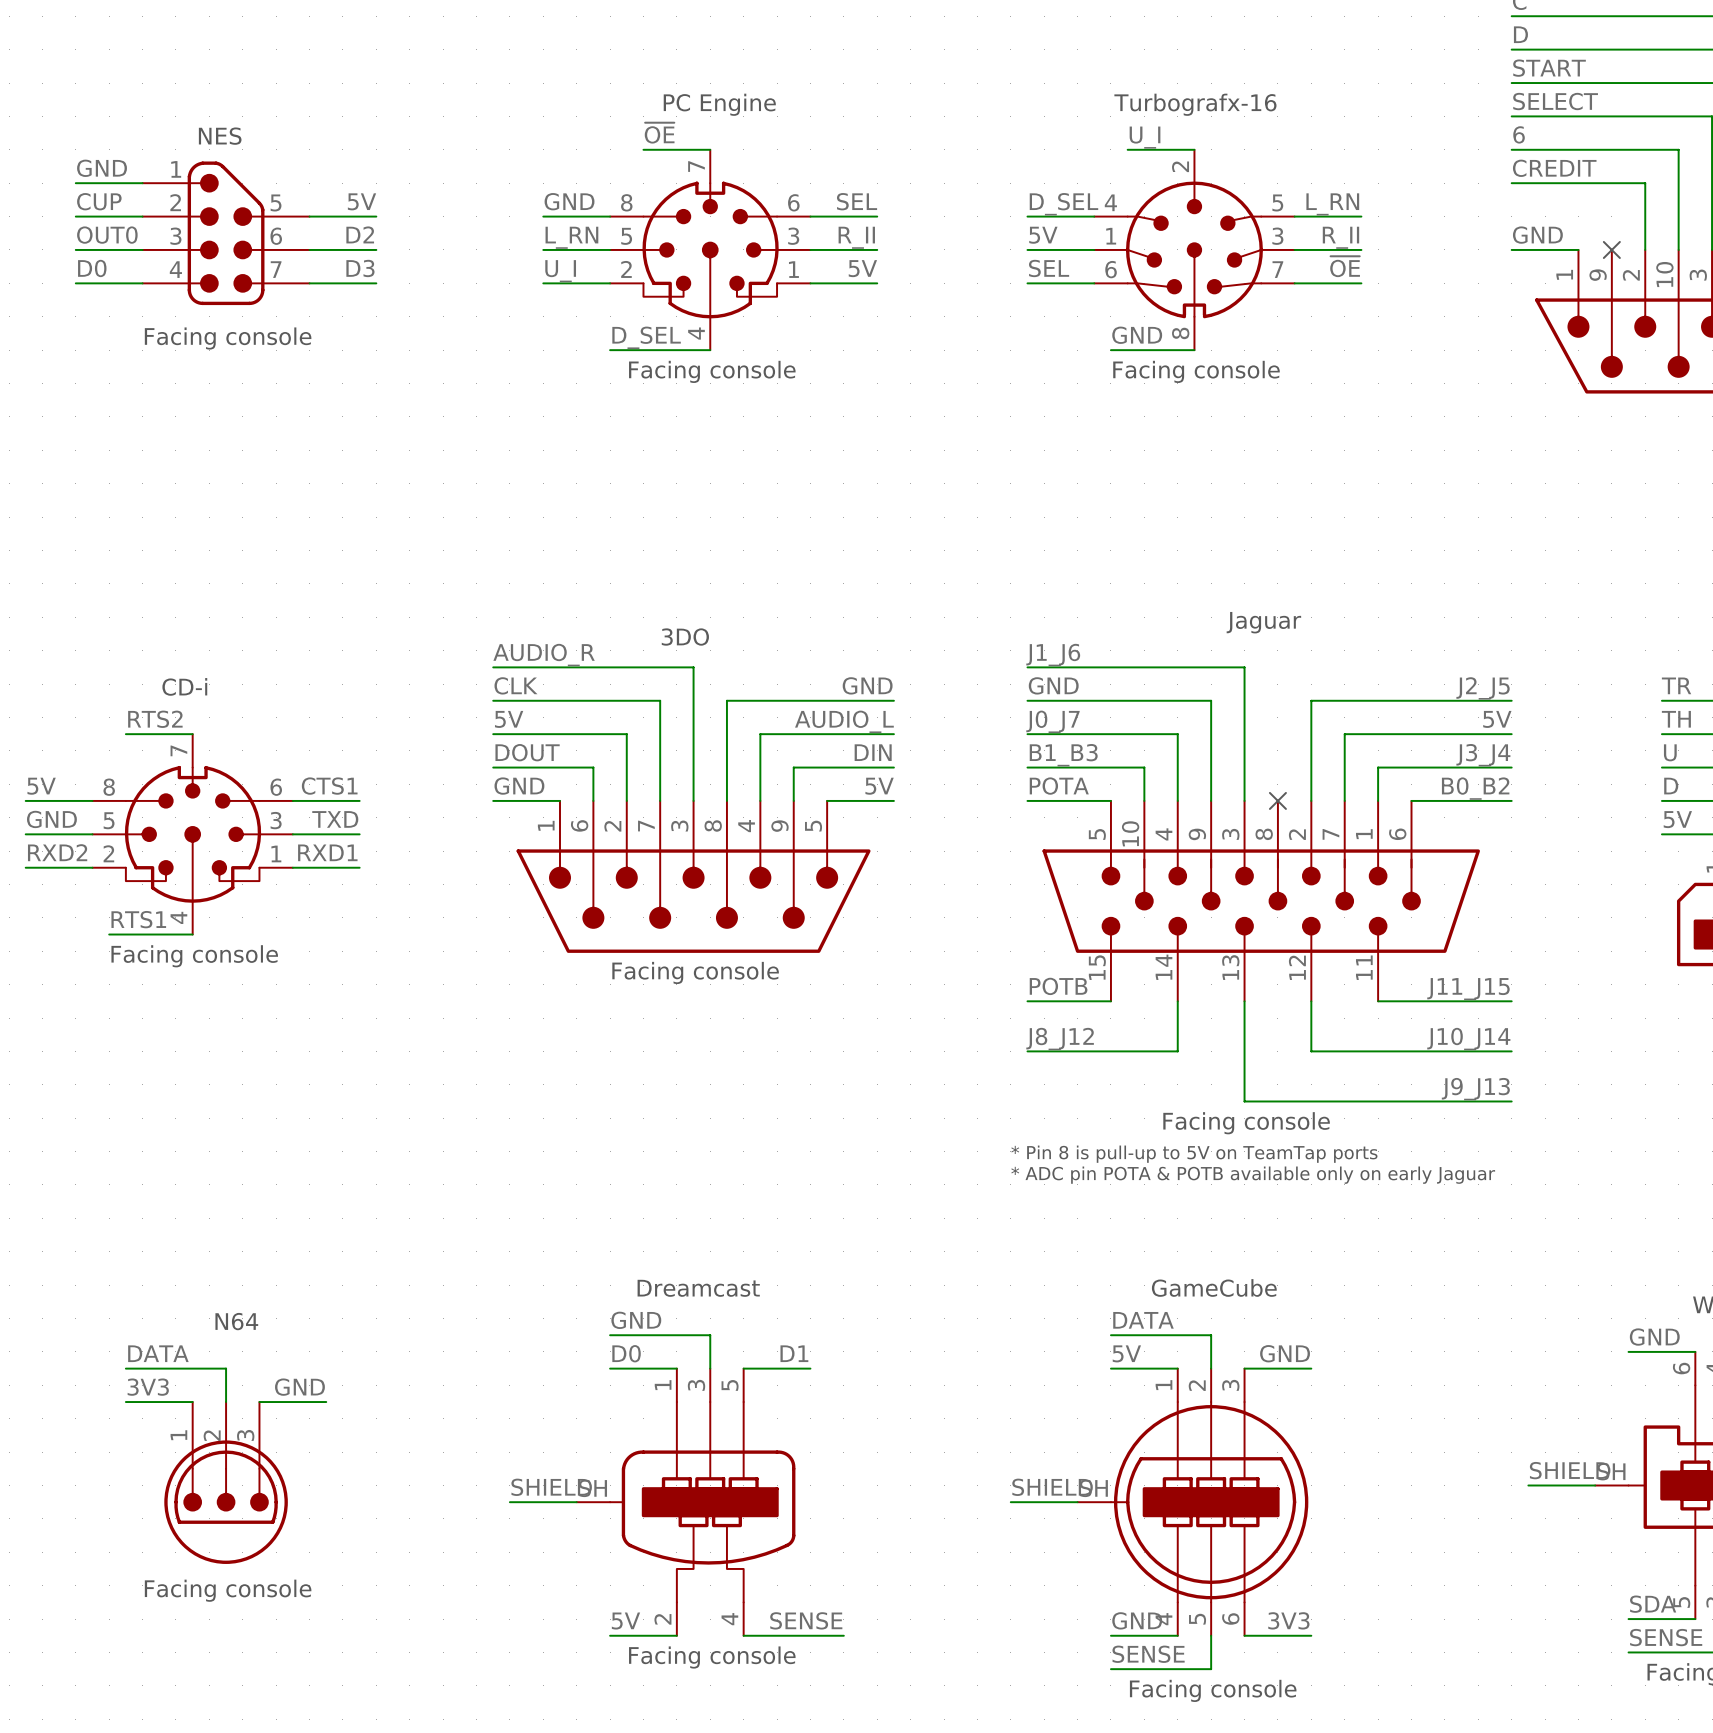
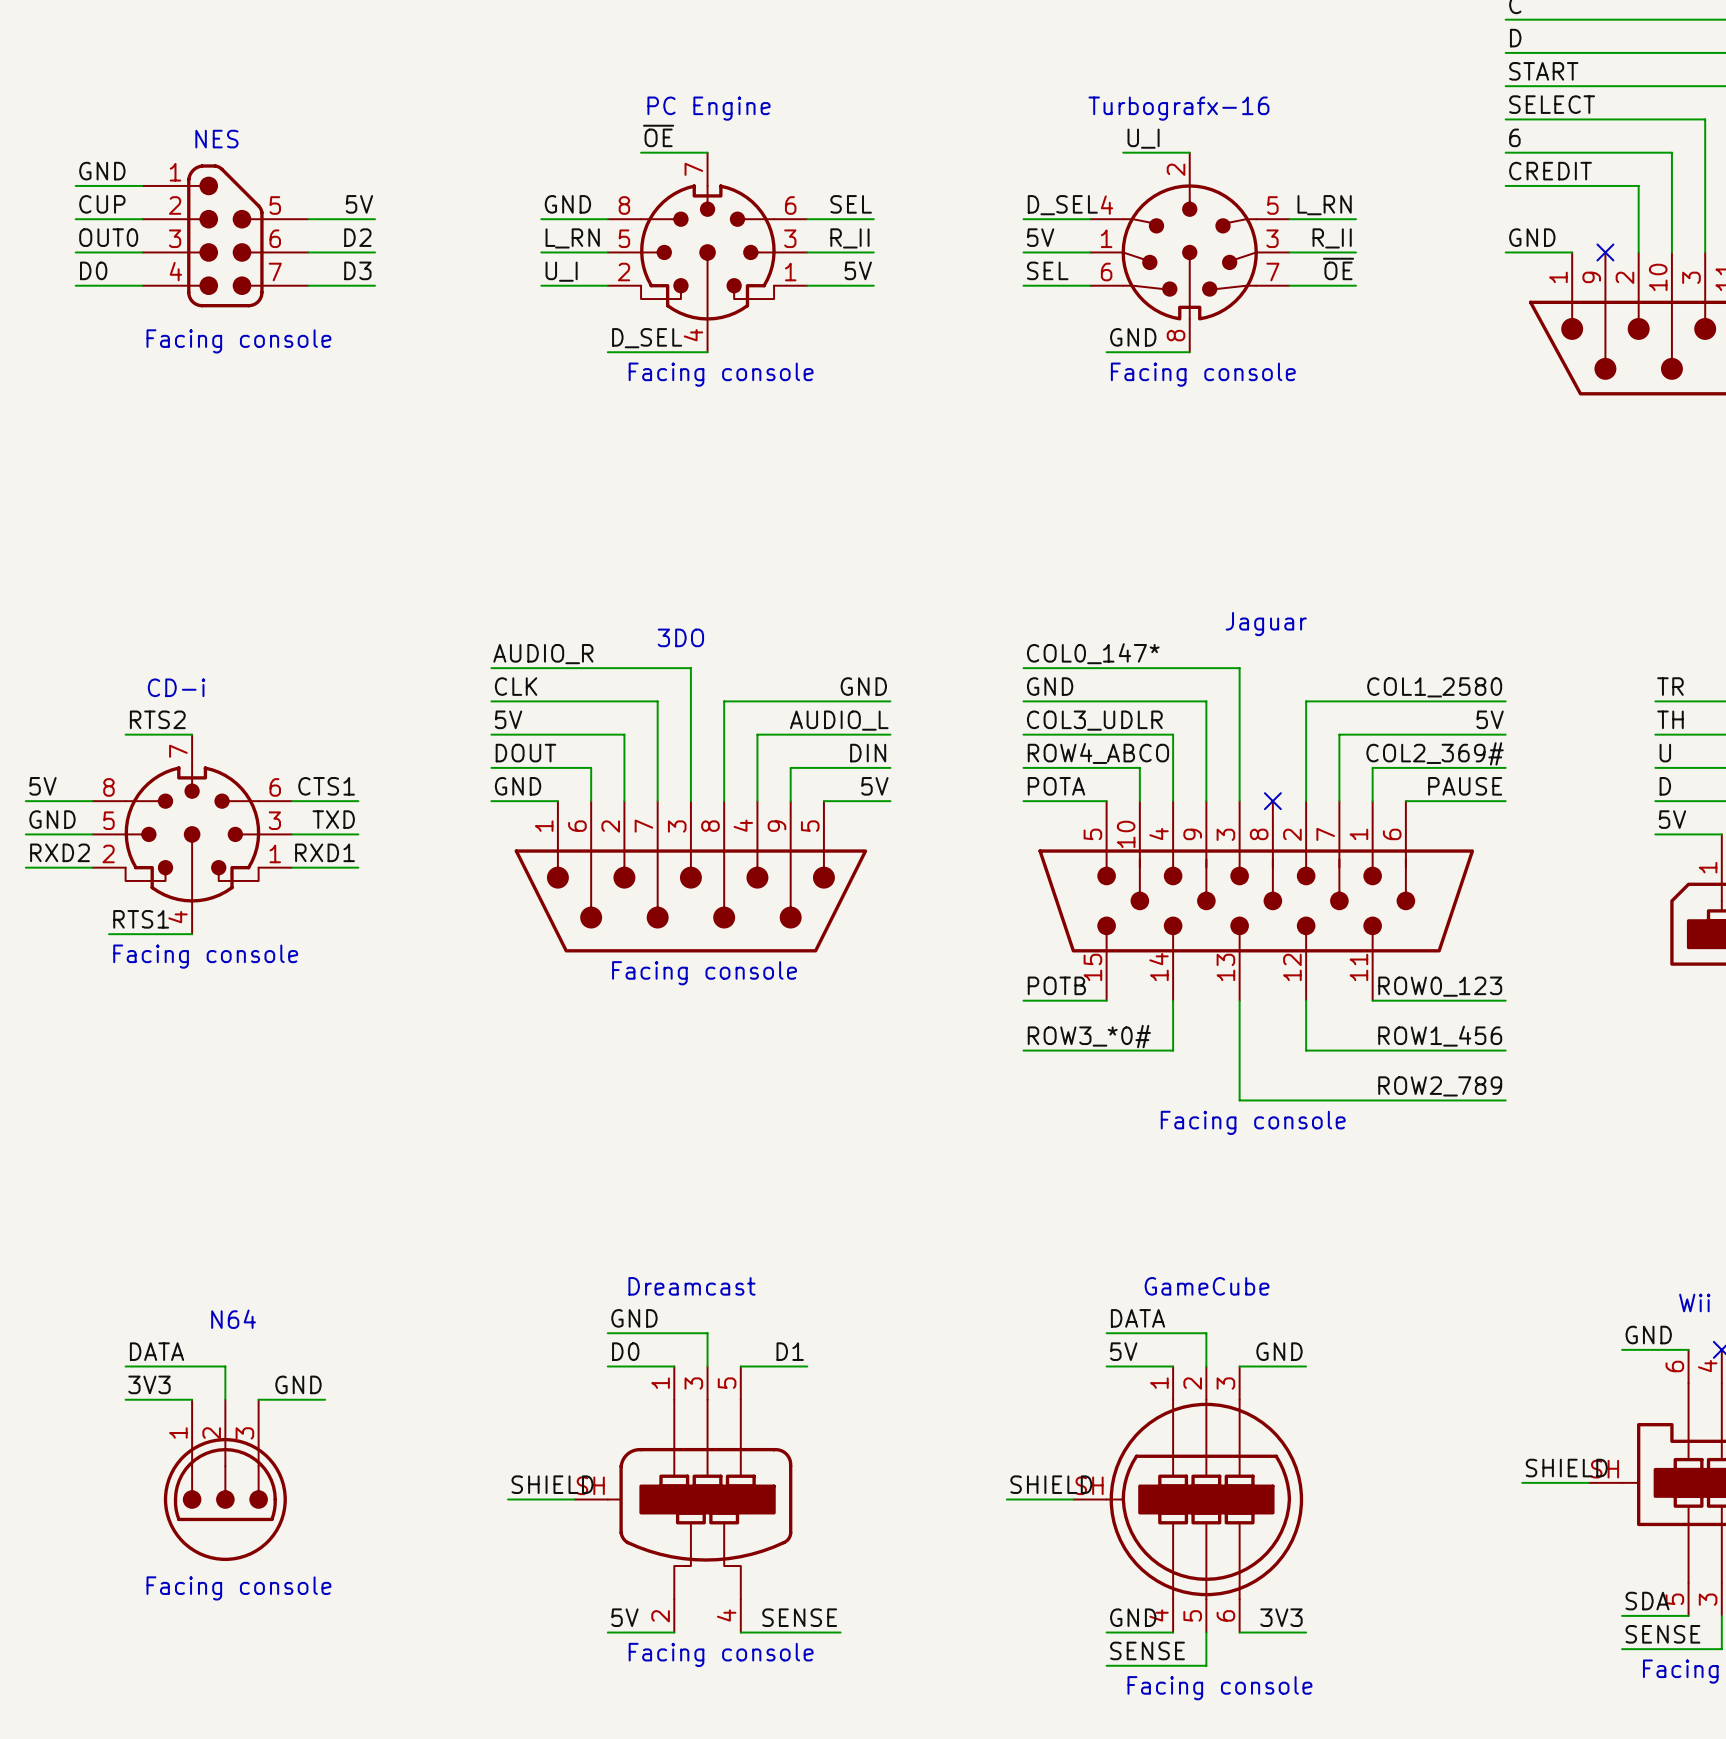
label: J1_J6 (1053, 655) -> COL0_147* (1093, 653)
label: J2_J5 (1483, 688) -> COL1_2580 (1434, 687)
label: J0_J7 (1052, 721) -> COL3_UDLR (1094, 720)
label: B1_B3 (1063, 755) -> ROW4_ABCO (1098, 753)
label: J3_J4 (1483, 755) -> COL2_369# (1435, 753)
label: B0_B2 (1475, 788) -> PAUSE (1465, 786)
label: J11_J15 (1468, 989) -> ROW0_123 (1440, 986)
label: J8_J12 (1060, 1039) -> ROW3_*0# (1089, 1036)
label: J10_J14 (1468, 1039) -> ROW1_456 (1440, 1036)
label: J9_J13 (1475, 1089) -> ROW2_789 (1440, 1086)
text: * Pin 8 is pull-up to 5V on TeamTap ports (1194, 1154) -> none
text: * ADC pin POTA & POTB available only on early Jaguar (1253, 1175) -> none

